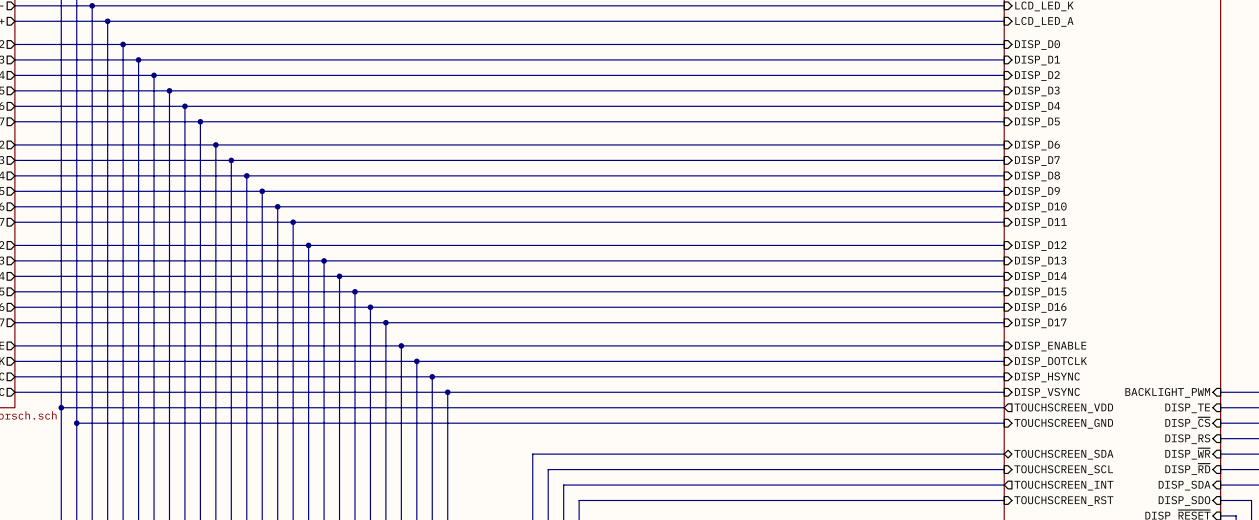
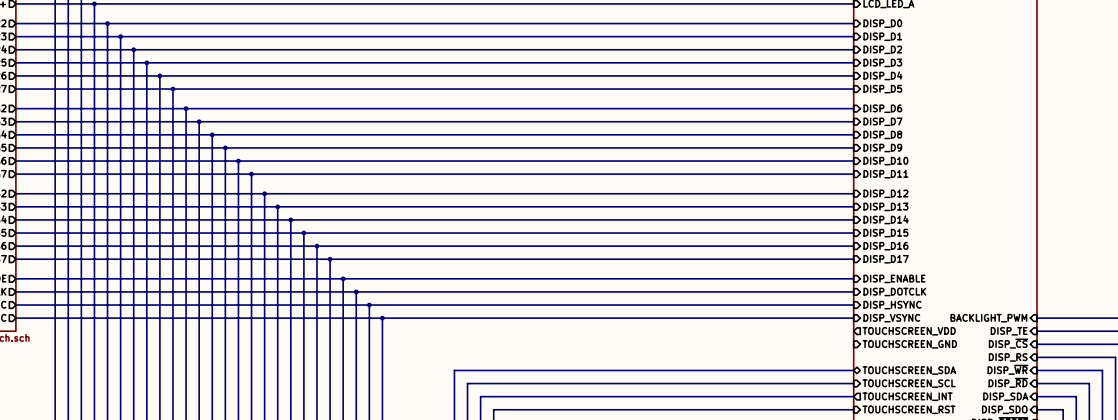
wire: (61, 407) (1004, 407) -> none
junction: (61, 407) -> none
wire: (76, 423) (1004, 423) -> none
junction: (76, 423) -> none

